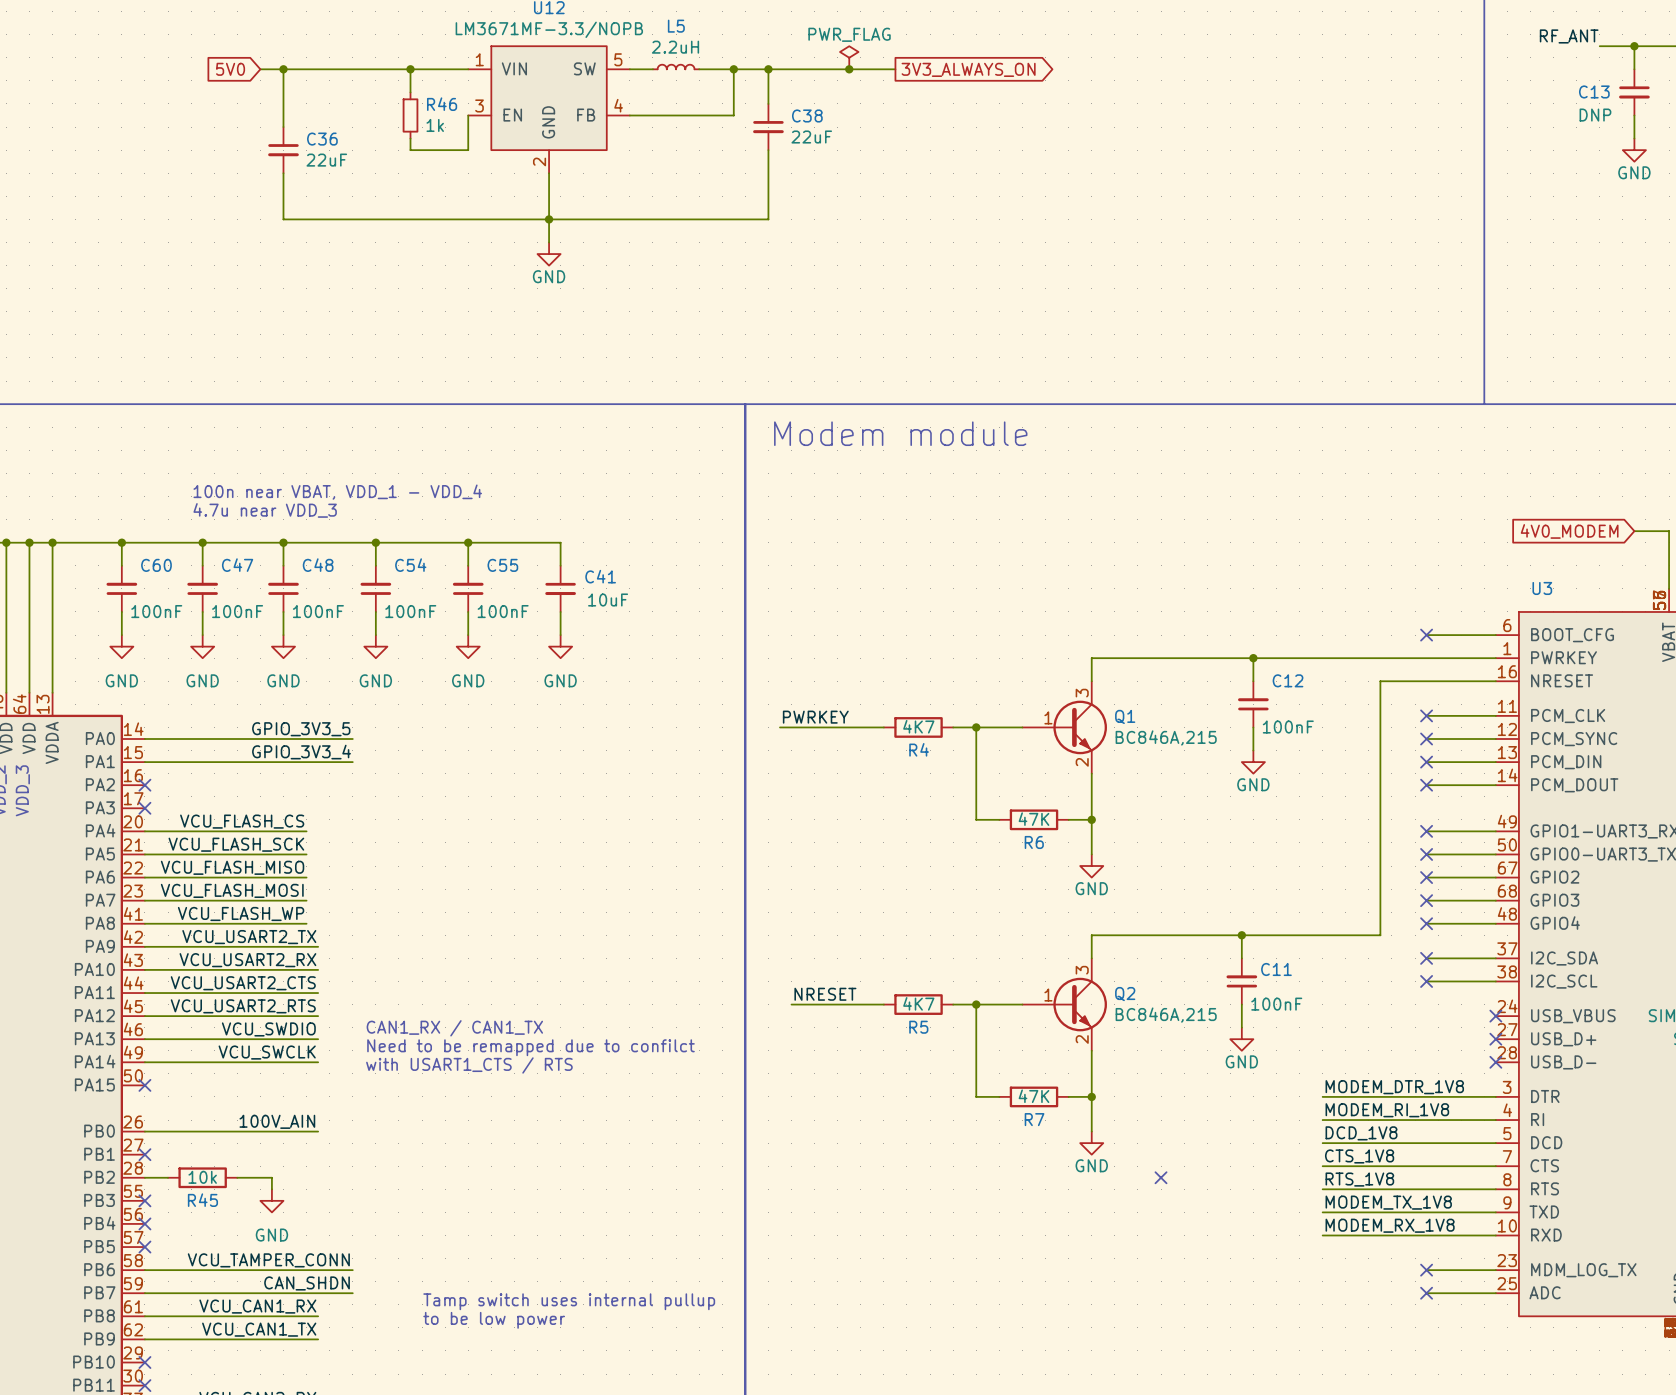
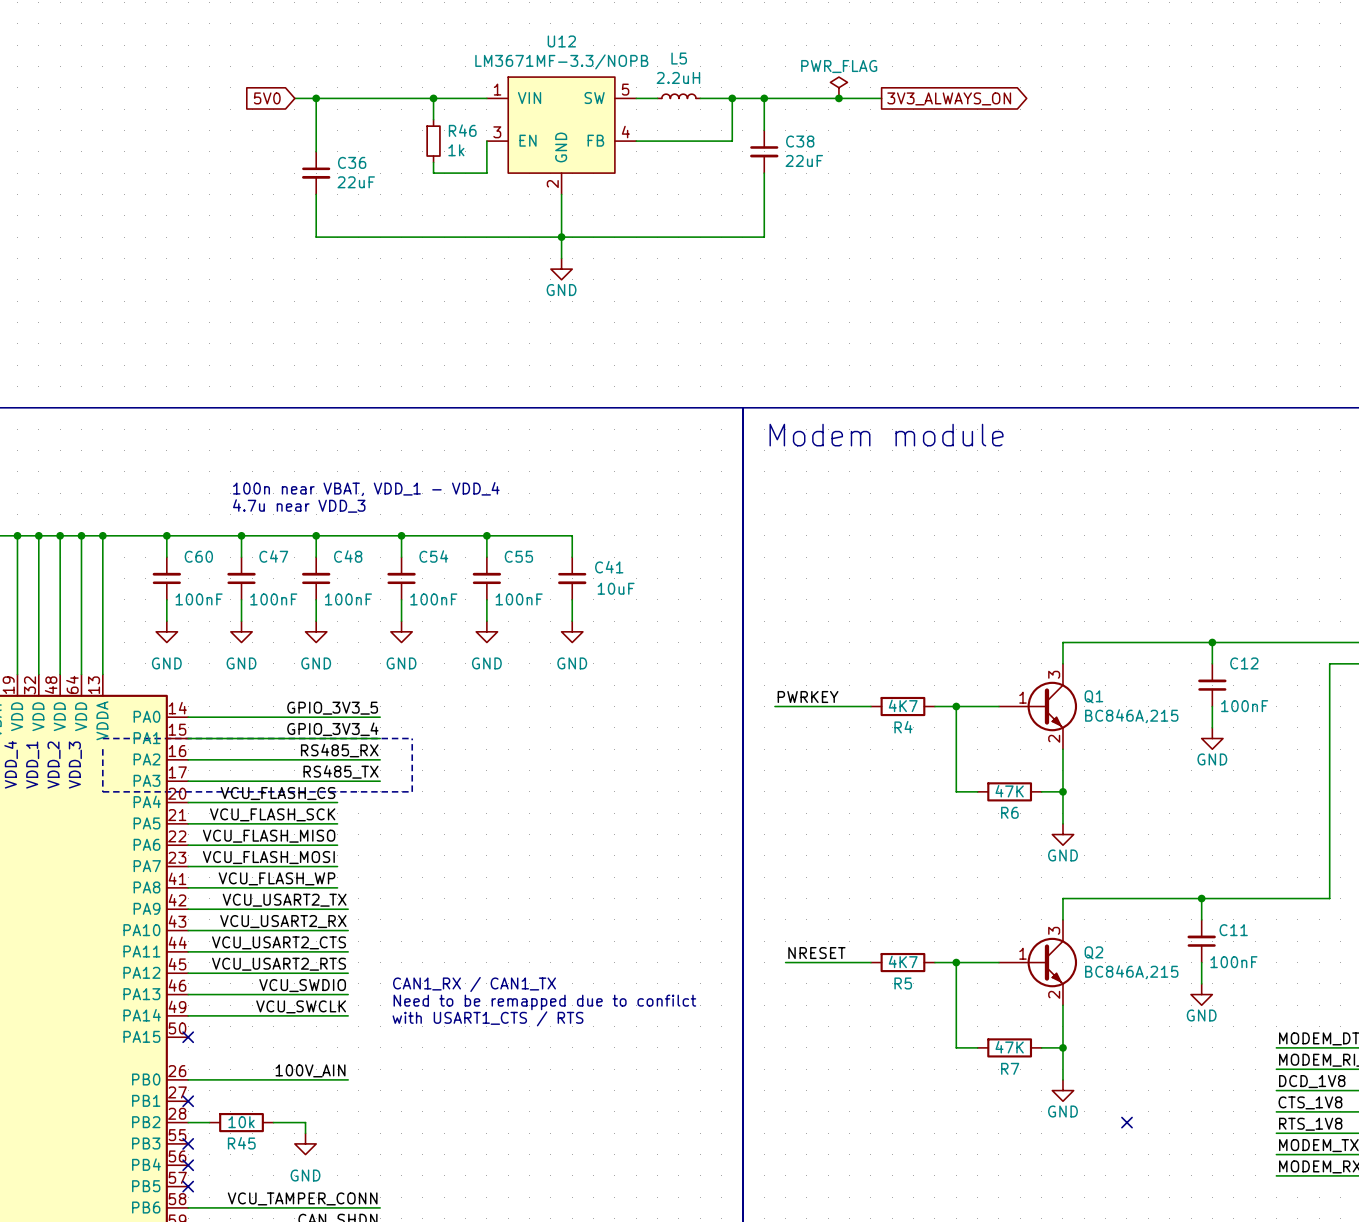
line: none -> (102, 738) (412, 738) (412, 791) (102, 791) (102, 749)
label: none -> RS485_RX (339, 750)
wire: none -> (188, 759) (380, 759)
no-connect mark: (144, 785) -> none
label: none -> RS485_TX (341, 771)
wire: none -> (188, 781) (380, 781)
no-connect mark: (144, 808) -> none

